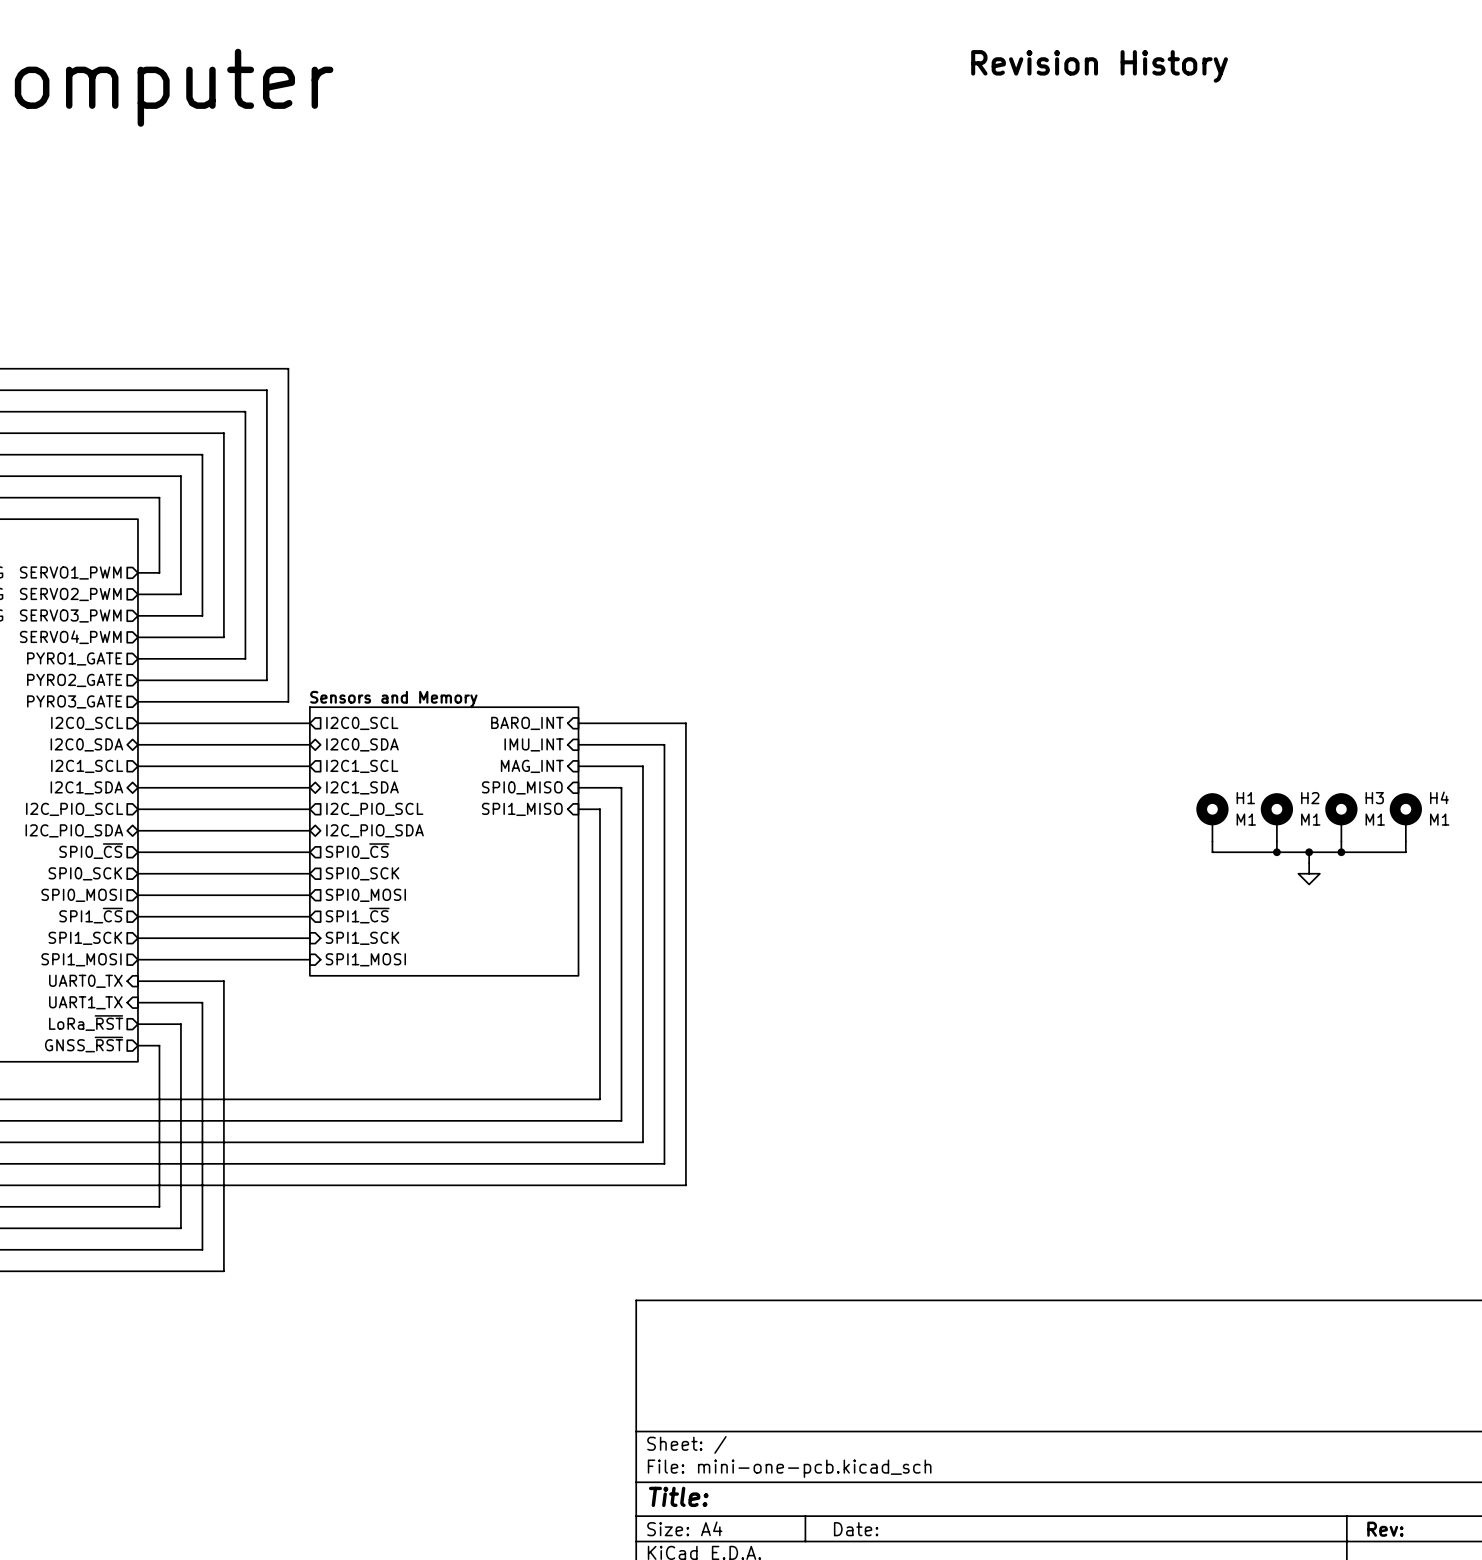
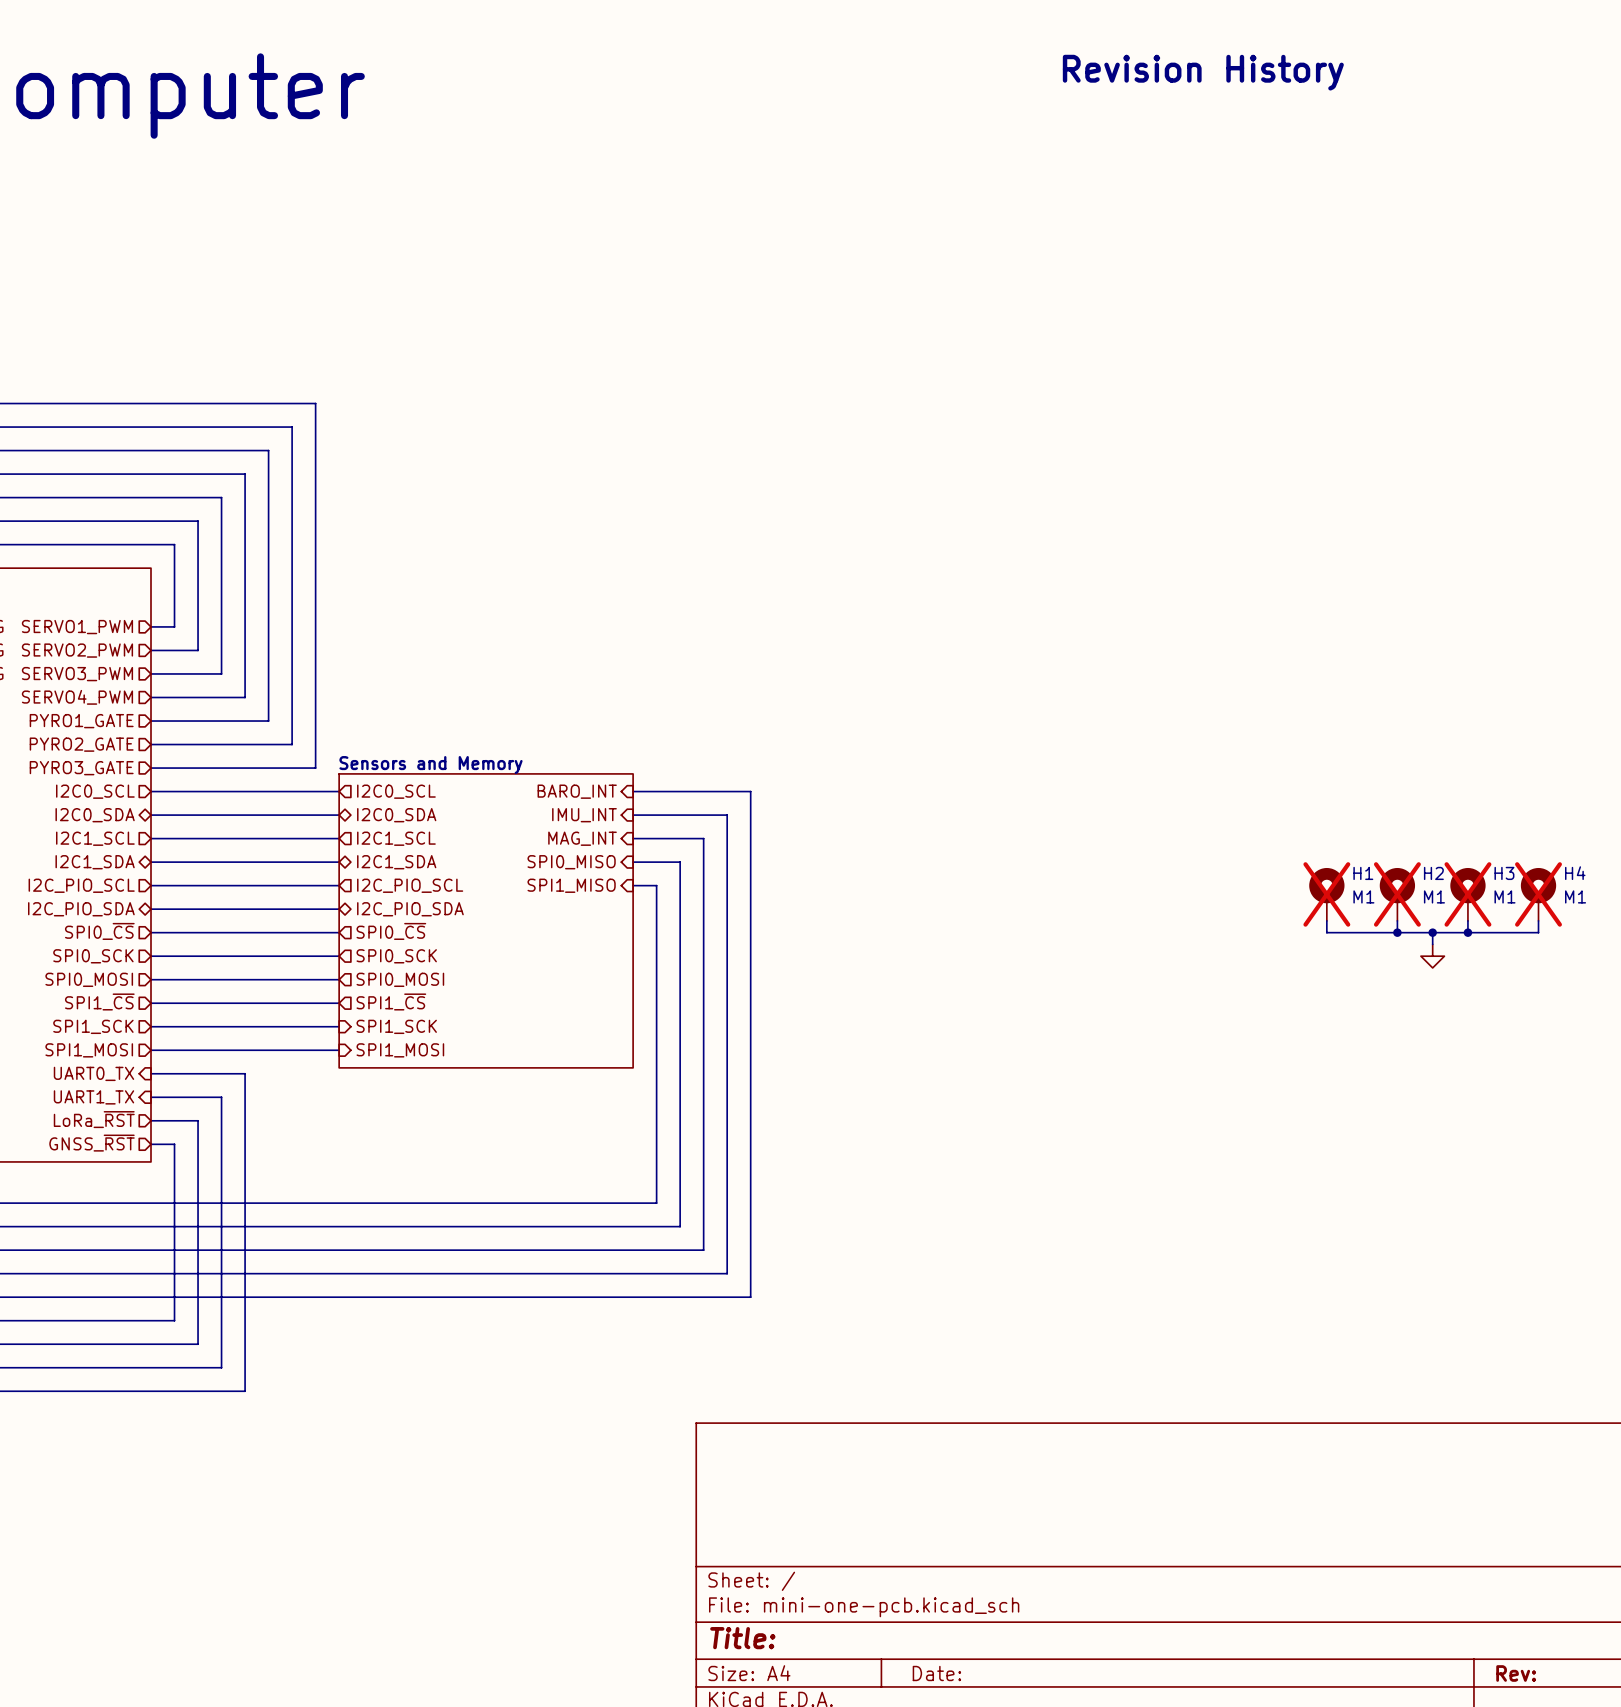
H1 do-not-place cross: none -> (1326, 894)
H2 do-not-place cross: none -> (1397, 894)
H3 do-not-place cross: none -> (1467, 894)
H4 do-not-place cross: none -> (1538, 894)

